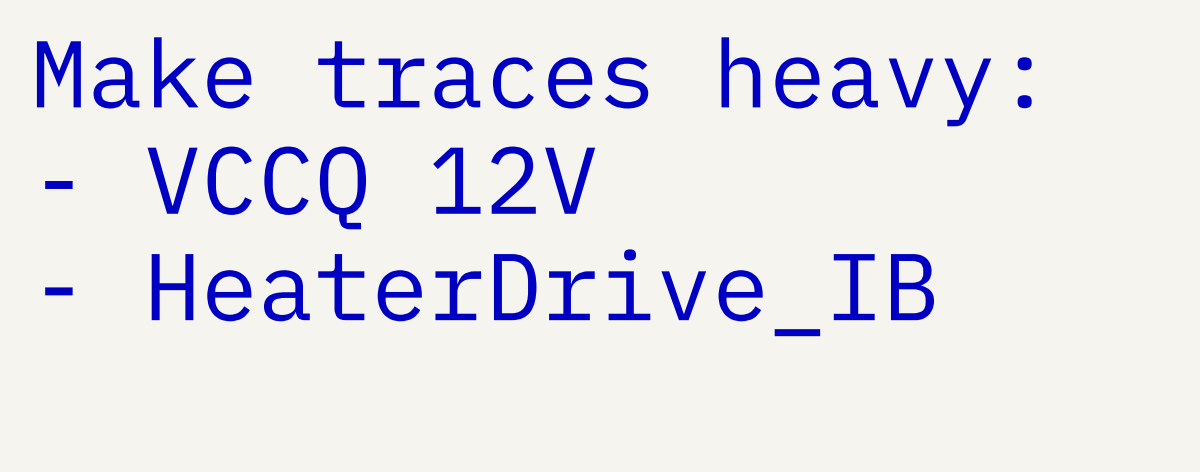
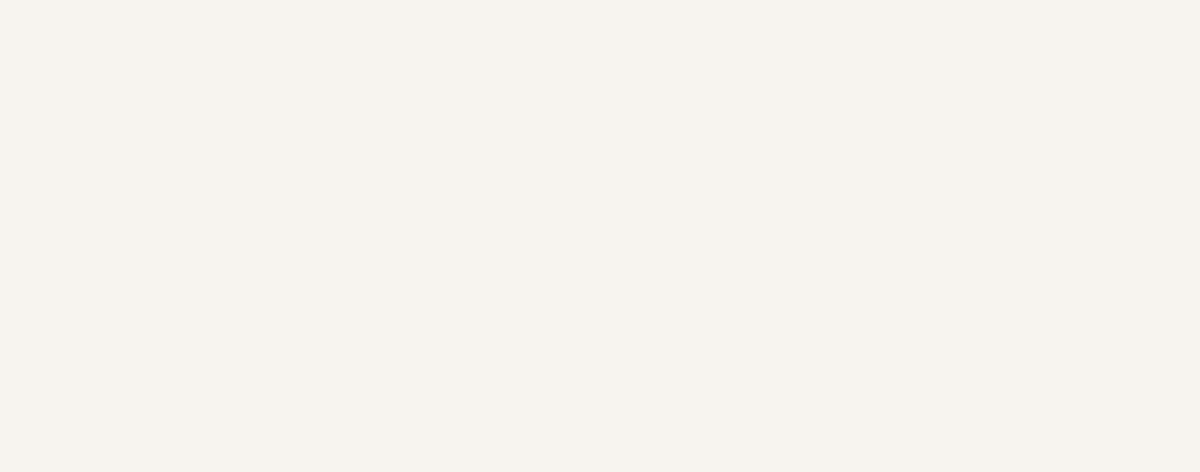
text: Make traces heavy: (534, 81) -> none
text: - VCCQ 12V (320, 187) -> none
text: - HeaterDrive_IB (489, 292) -> none

